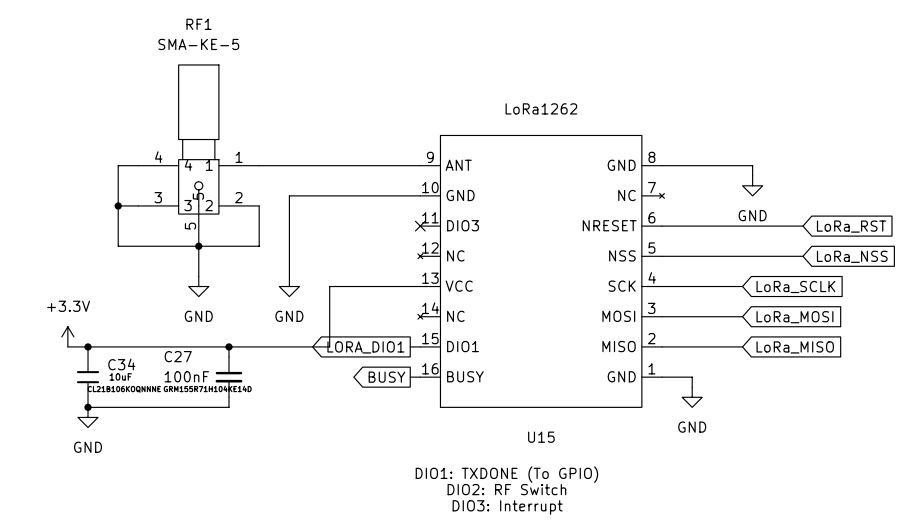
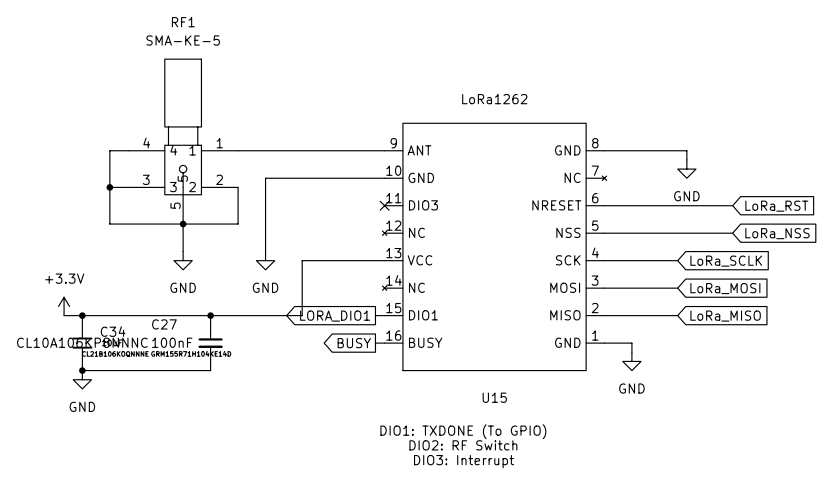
C34 text: none -> CL10A106KP8NNNC (82, 342)

